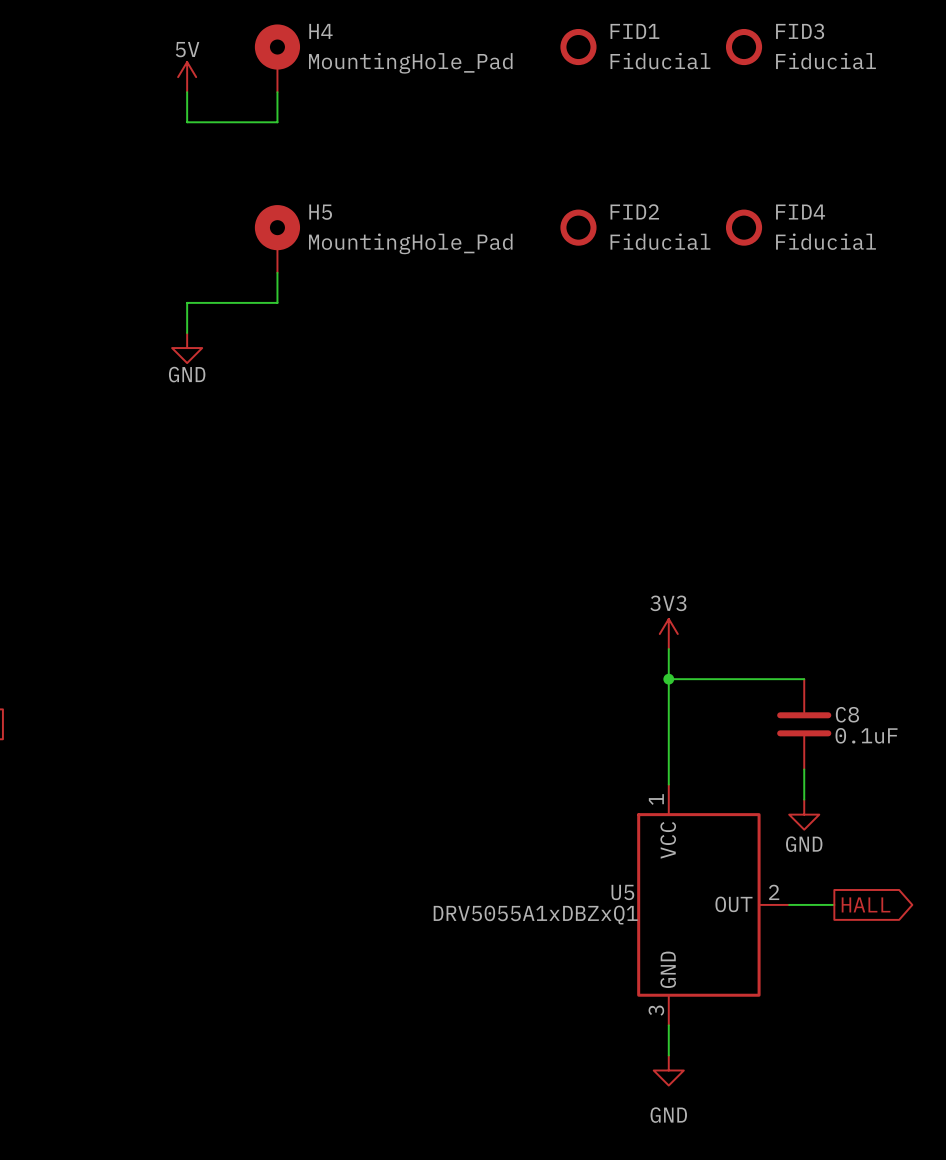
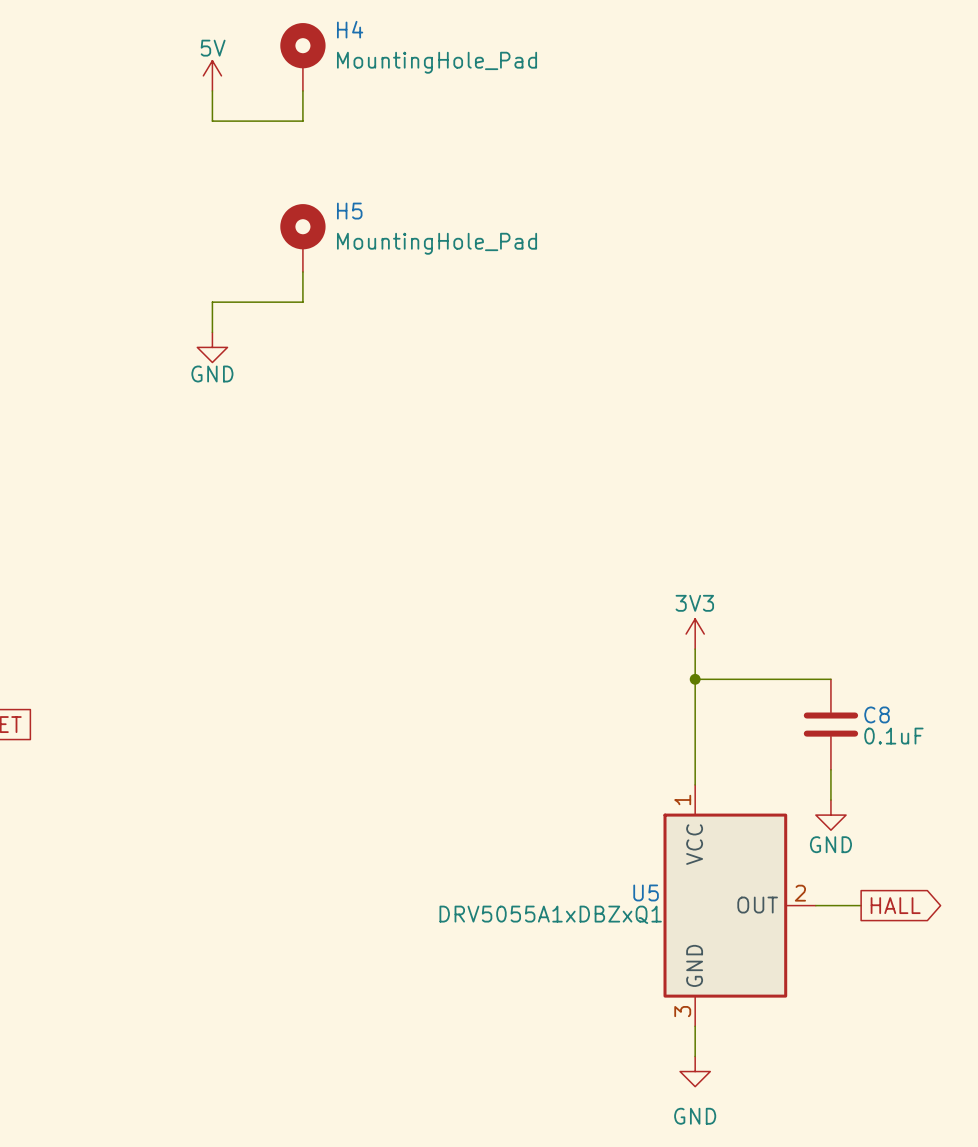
FID1: Fiducial (578, 47) -> none
FID3: Fiducial (744, 47) -> none
FID2: Fiducial (578, 227) -> none
FID4: Fiducial (744, 227) -> none

